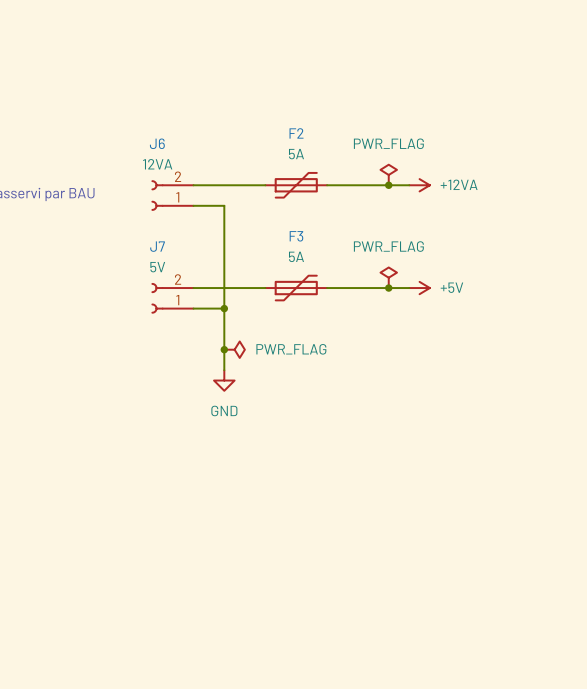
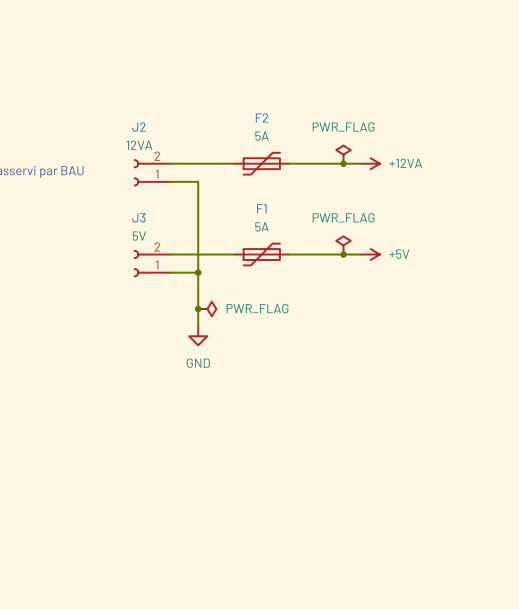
J6 name: J6 (157, 143) -> J2 (138, 127)
F3 name: F3 (296, 236) -> F1 (261, 208)
J7 name: J7 (157, 246) -> J3 (138, 217)

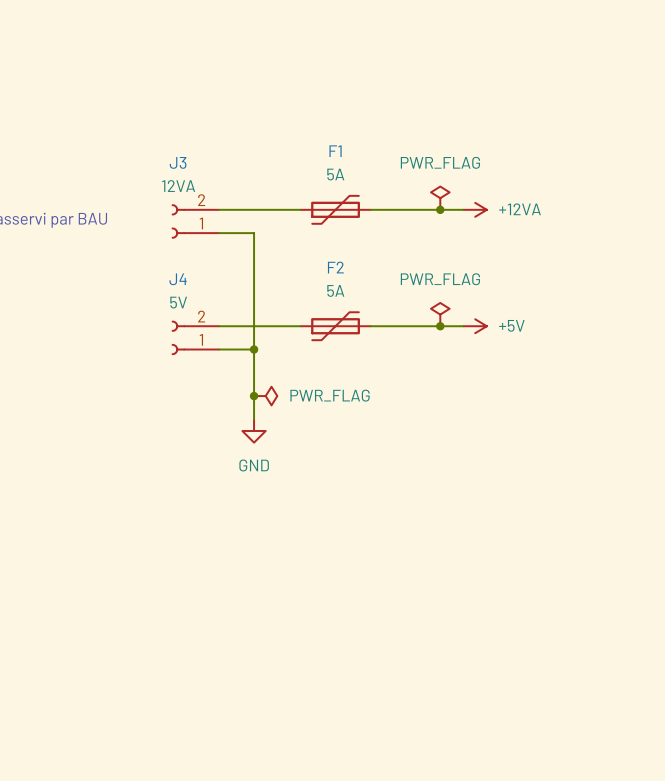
F2 name: F2 (262, 117) -> F1 (335, 151)
J2 name: J2 (138, 127) -> J3 (178, 162)
F1 name: F1 (261, 208) -> F2 (335, 267)
J3 name: J3 (138, 217) -> J4 (178, 279)

